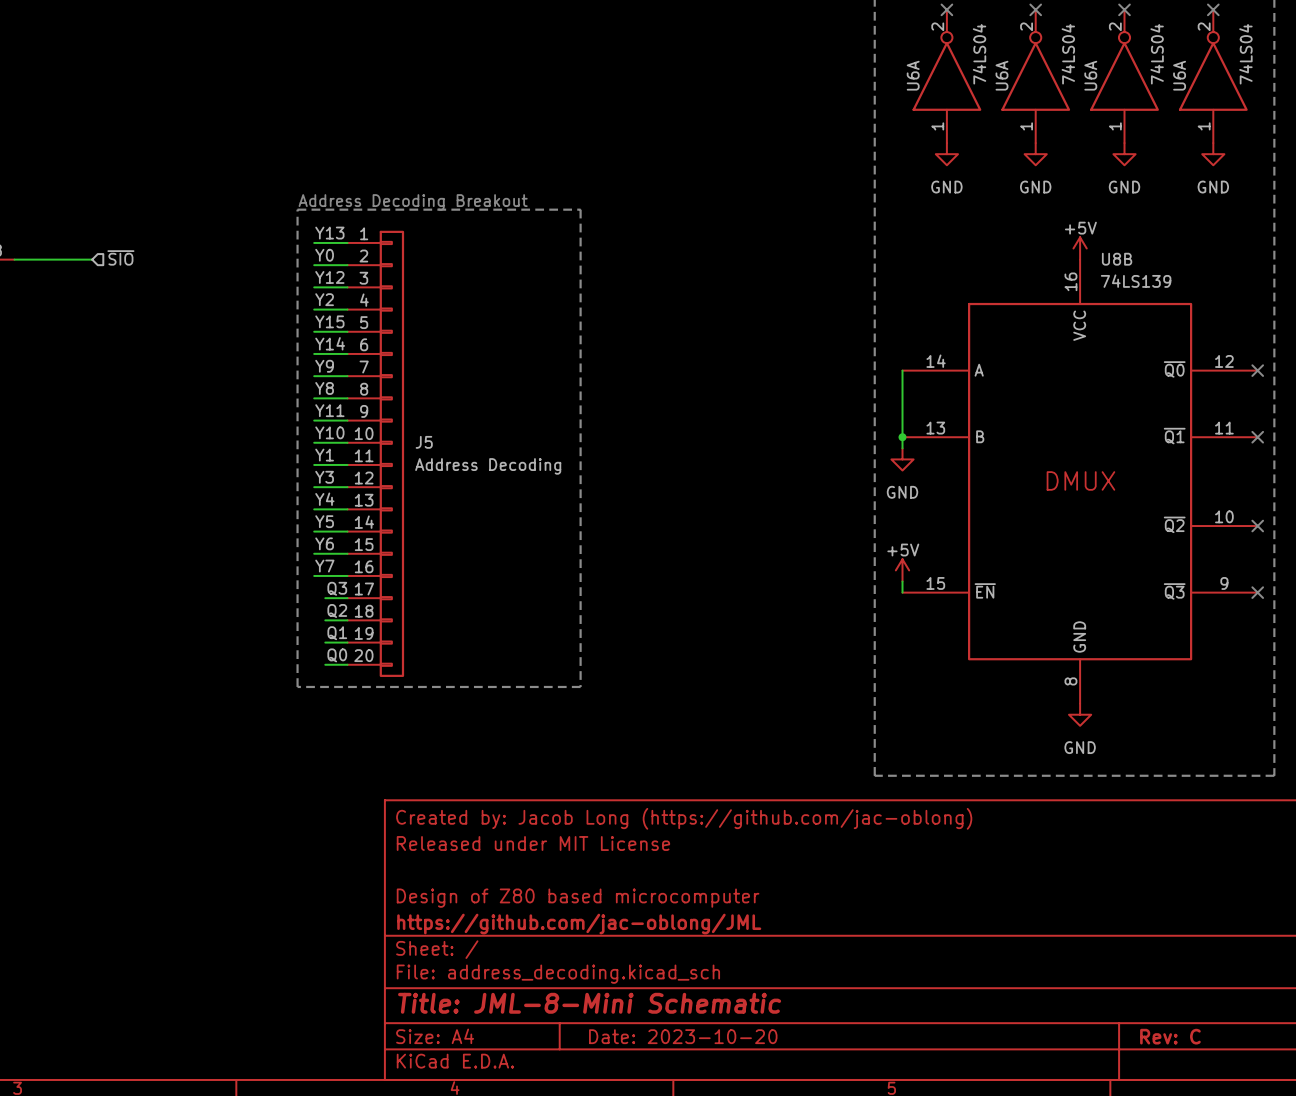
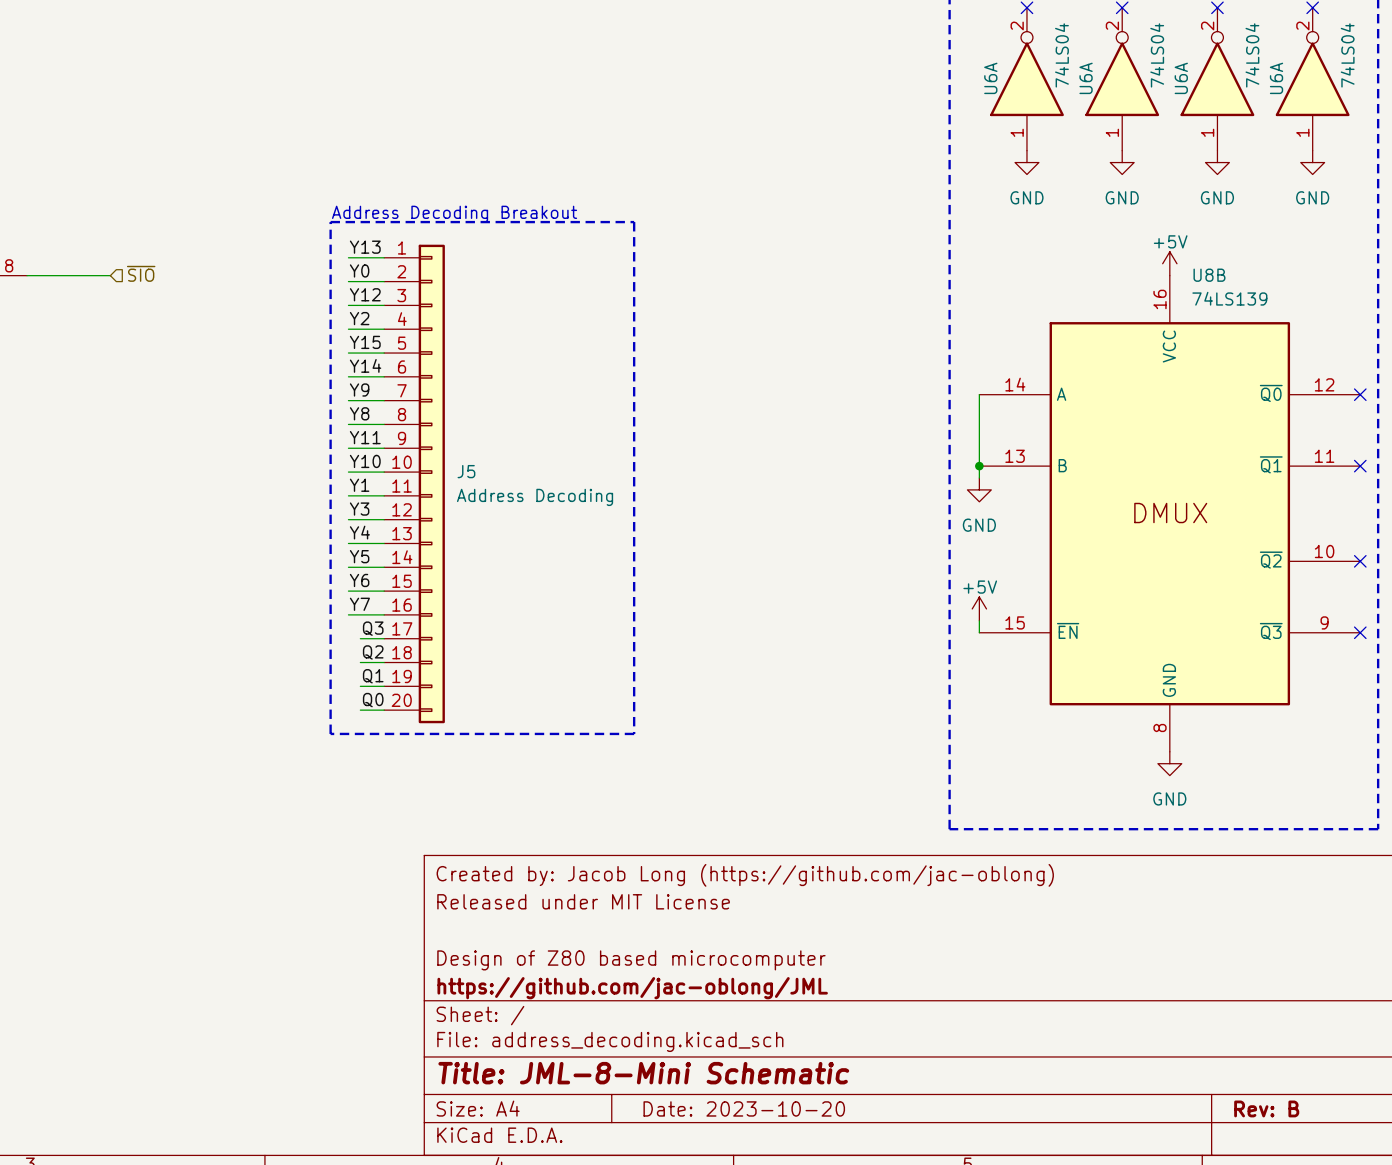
title block: Rev: C (1170, 1036) -> Rev: B (1266, 1108)

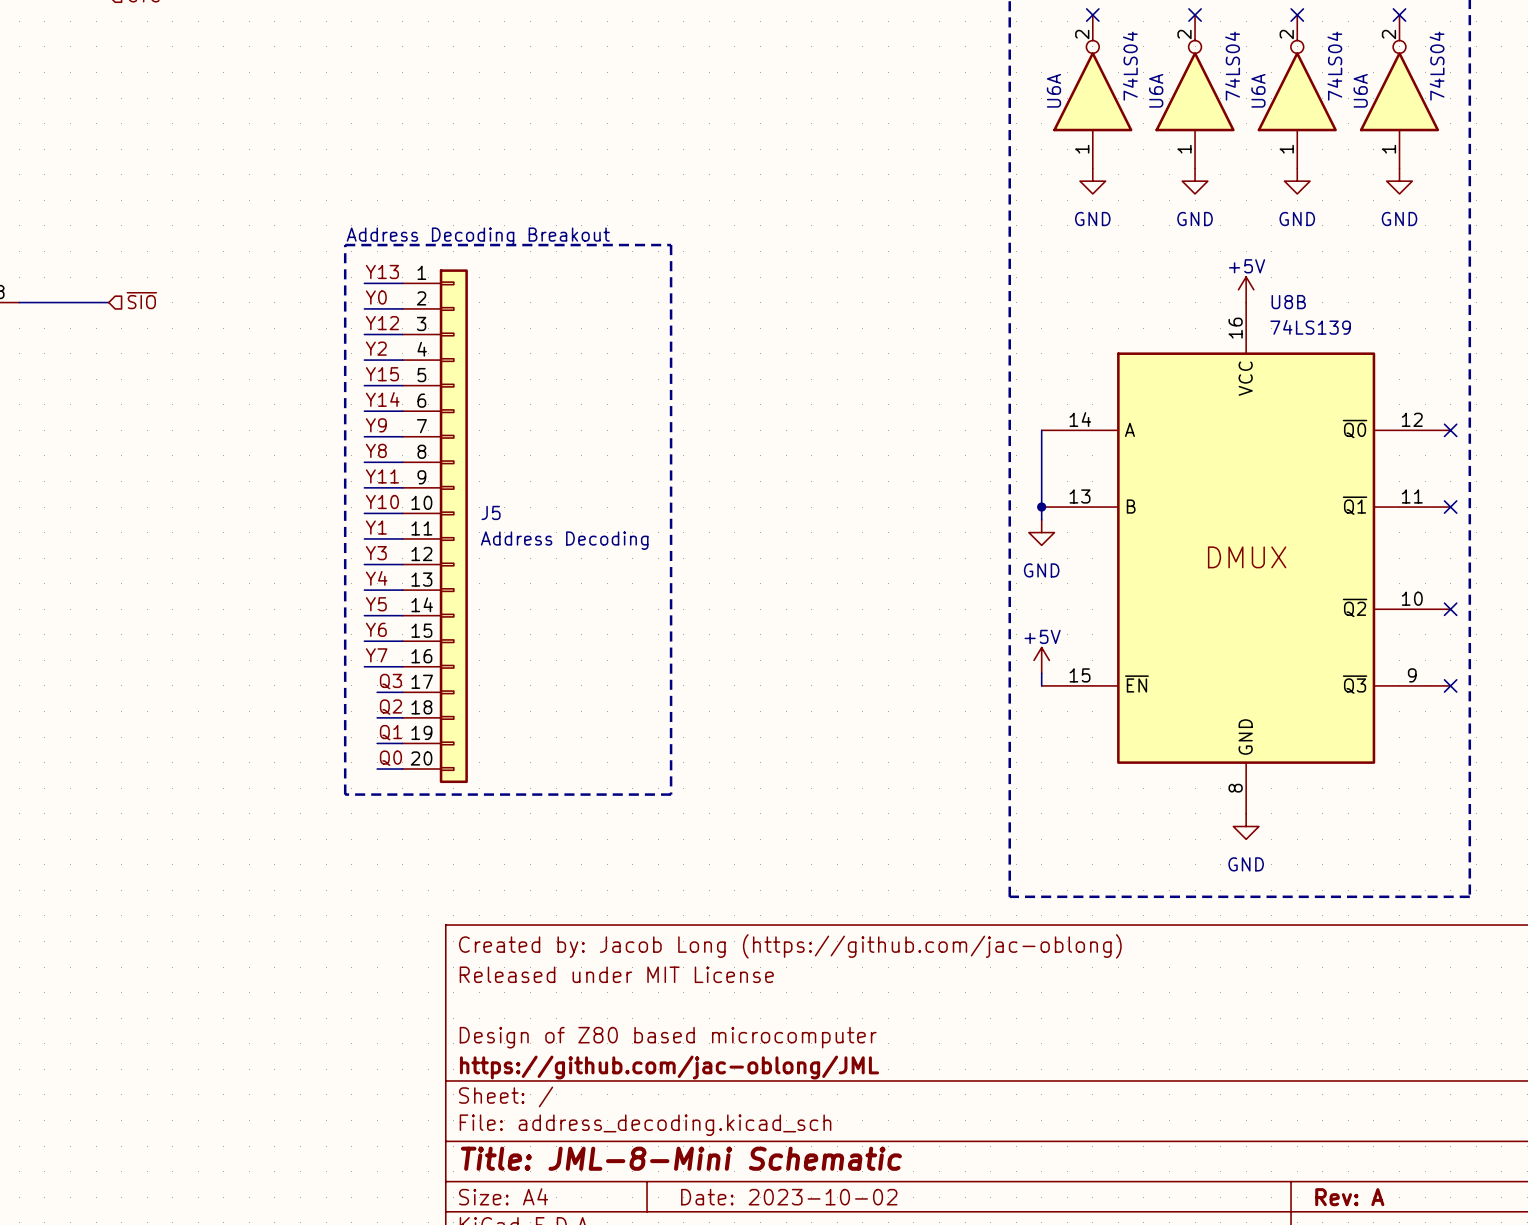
title block: Date: 2023-10-20 (744, 1108) -> Date: 2023-10-02 (789, 1197)
title block: Rev: B (1266, 1108) -> Rev: A (1349, 1197)

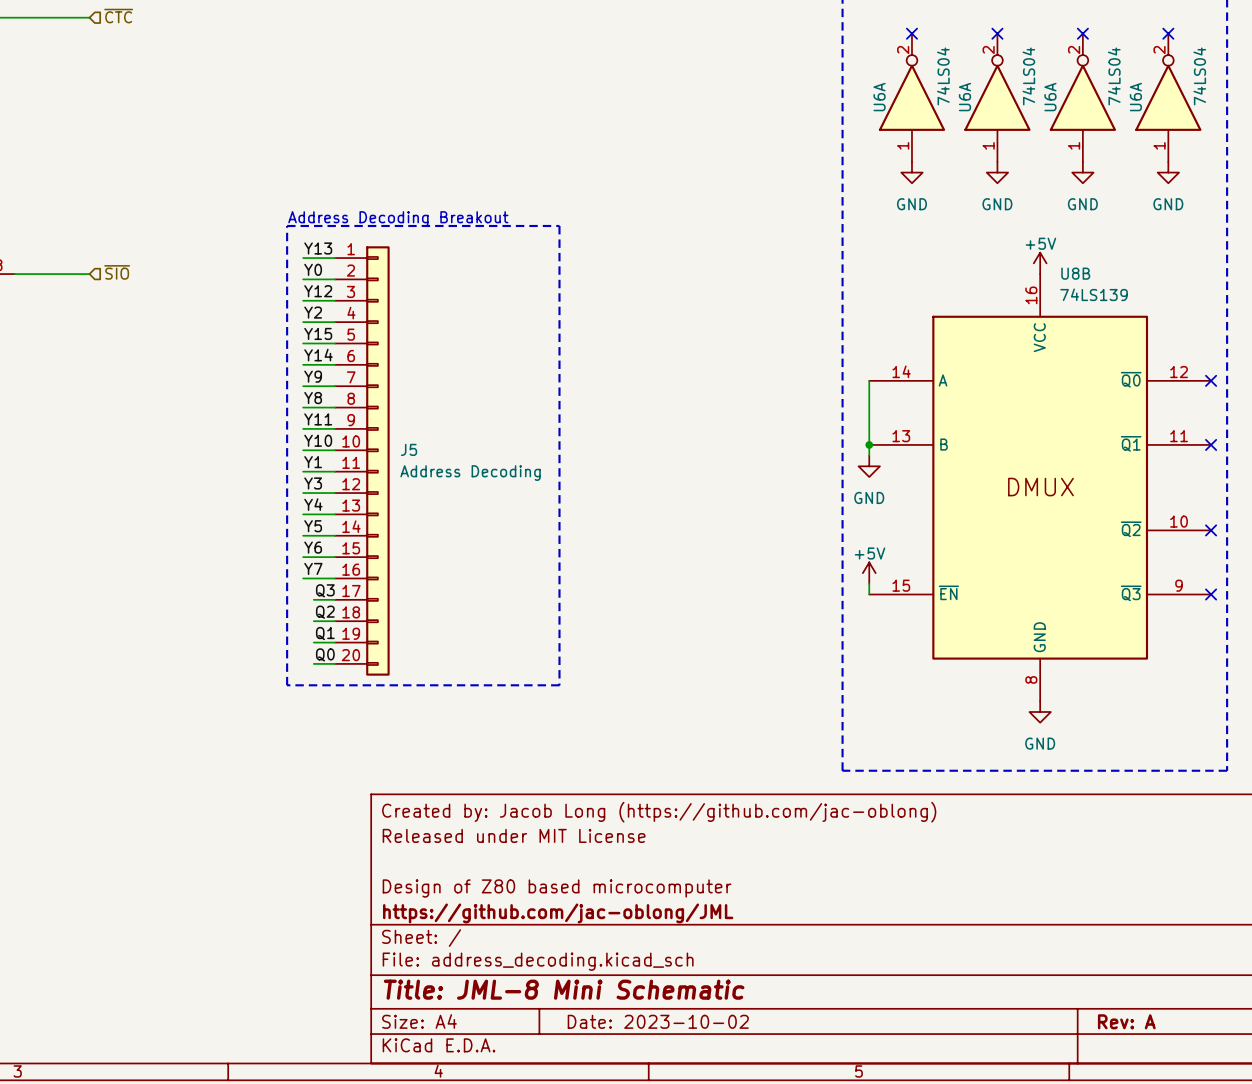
title block: Title: JML-8-Mini Schematic (681, 1158) -> Title: JML-8 Mini Schematic (564, 989)

